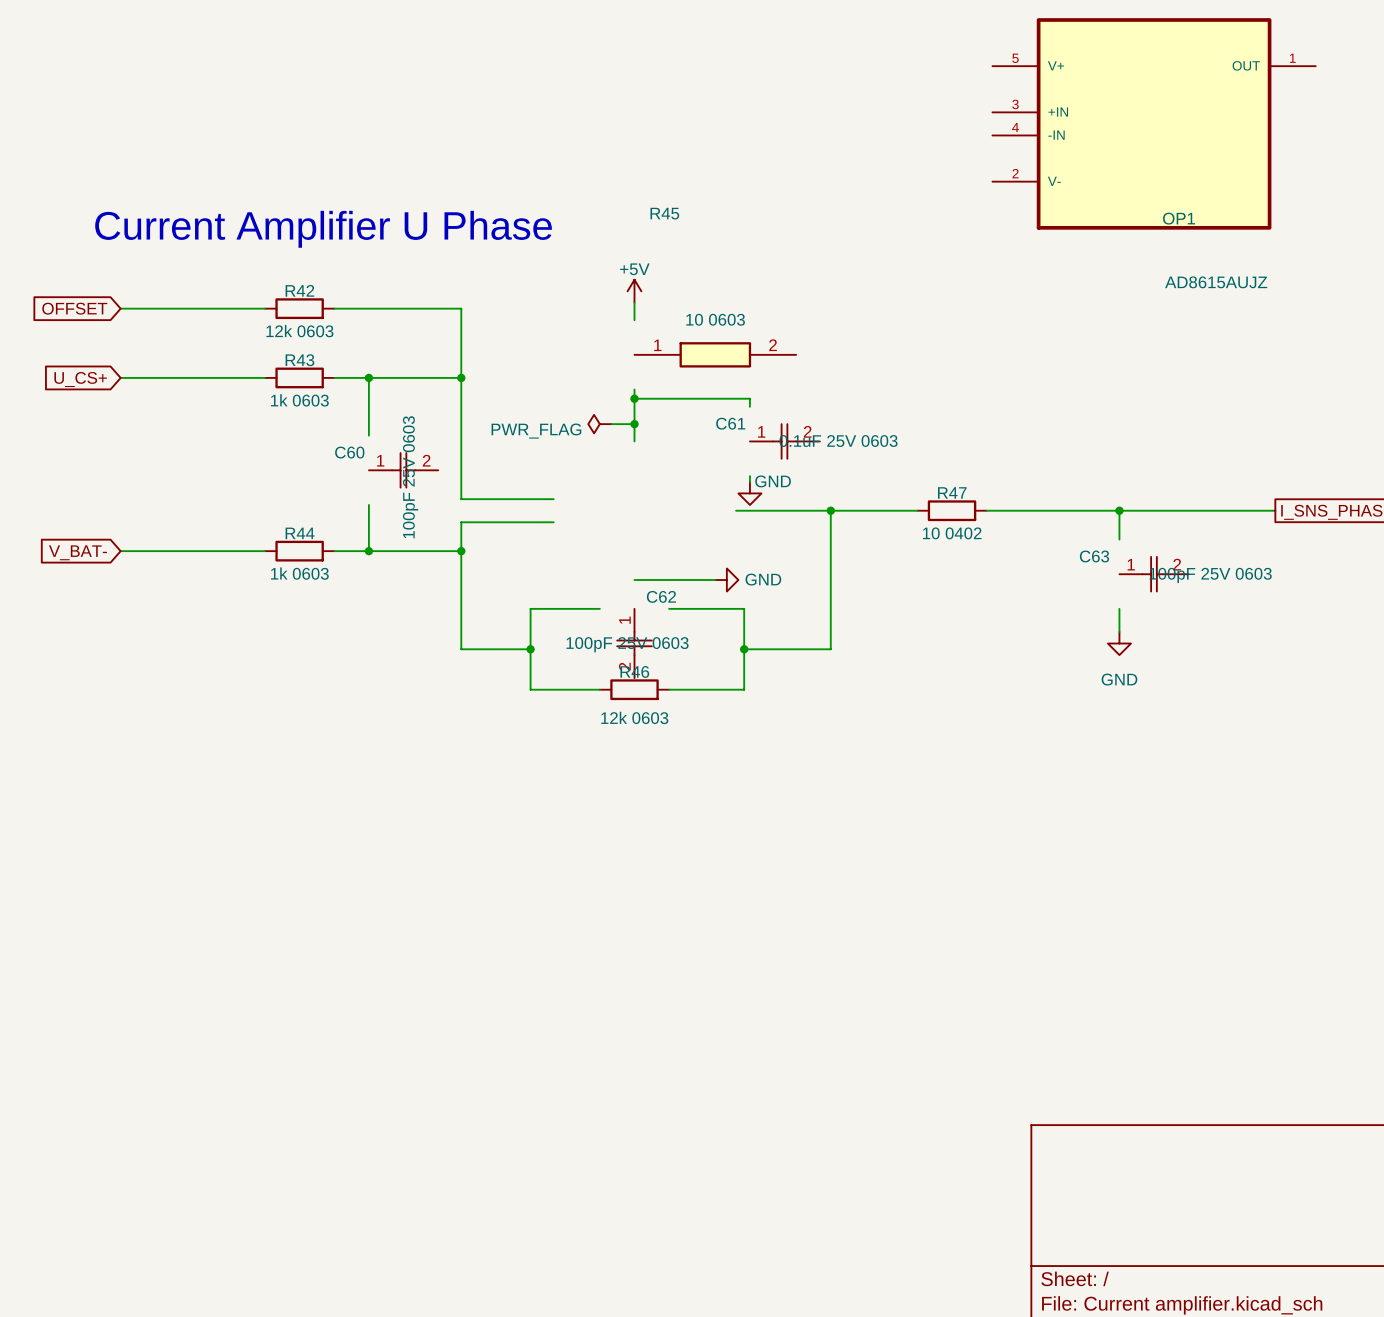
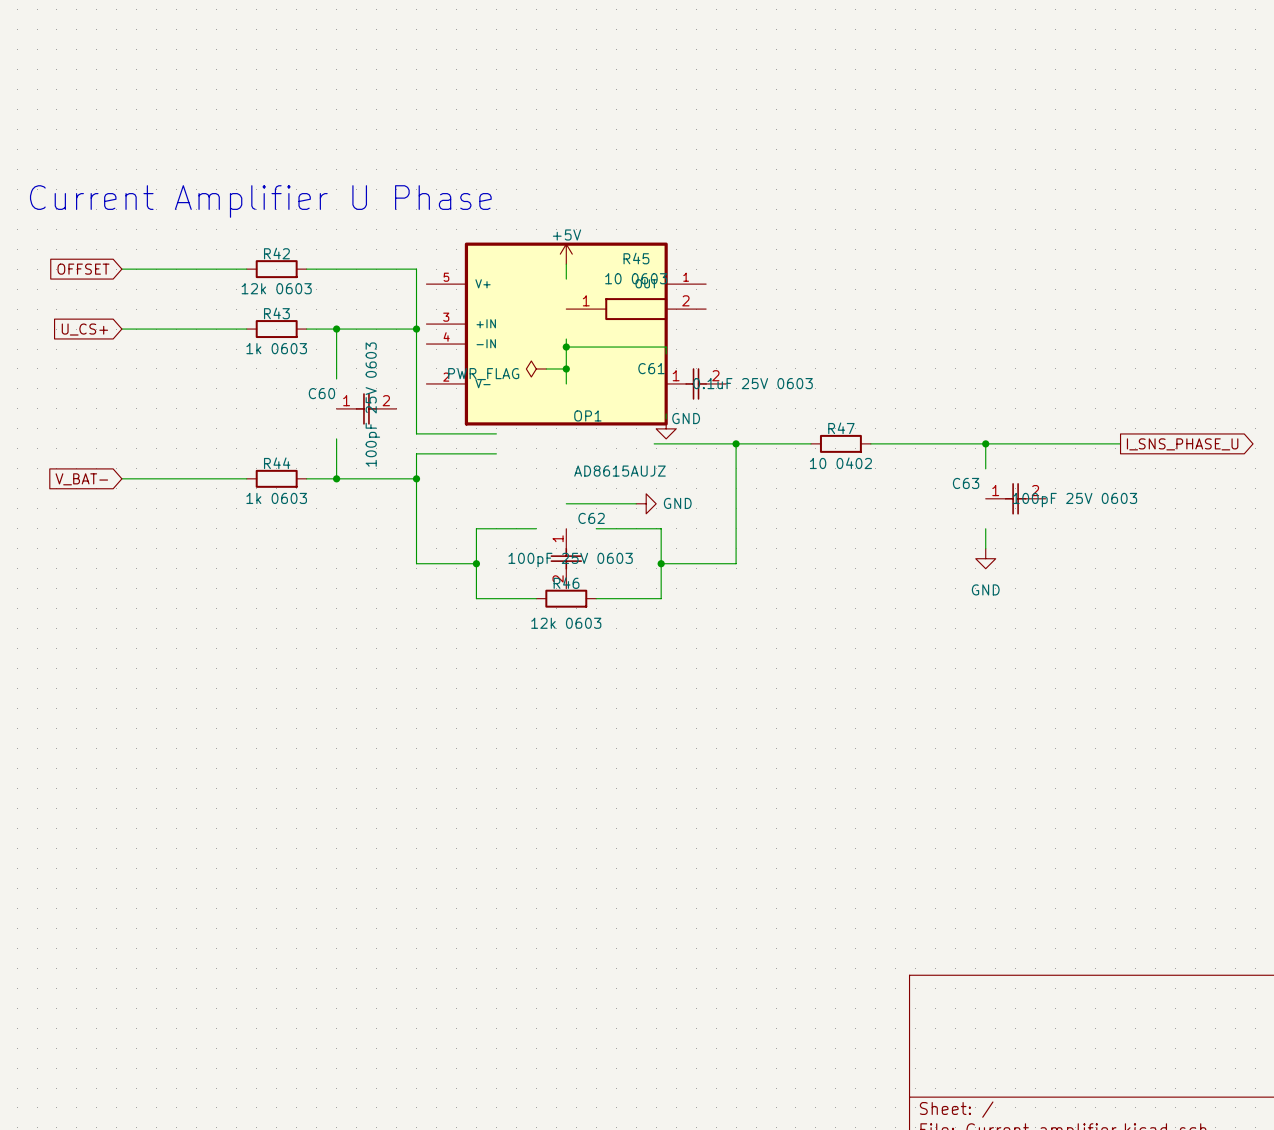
OP1 position: (1154, 123) -> (566, 334)
R45 name position: R45 (664, 213) -> R45 (636, 258)

